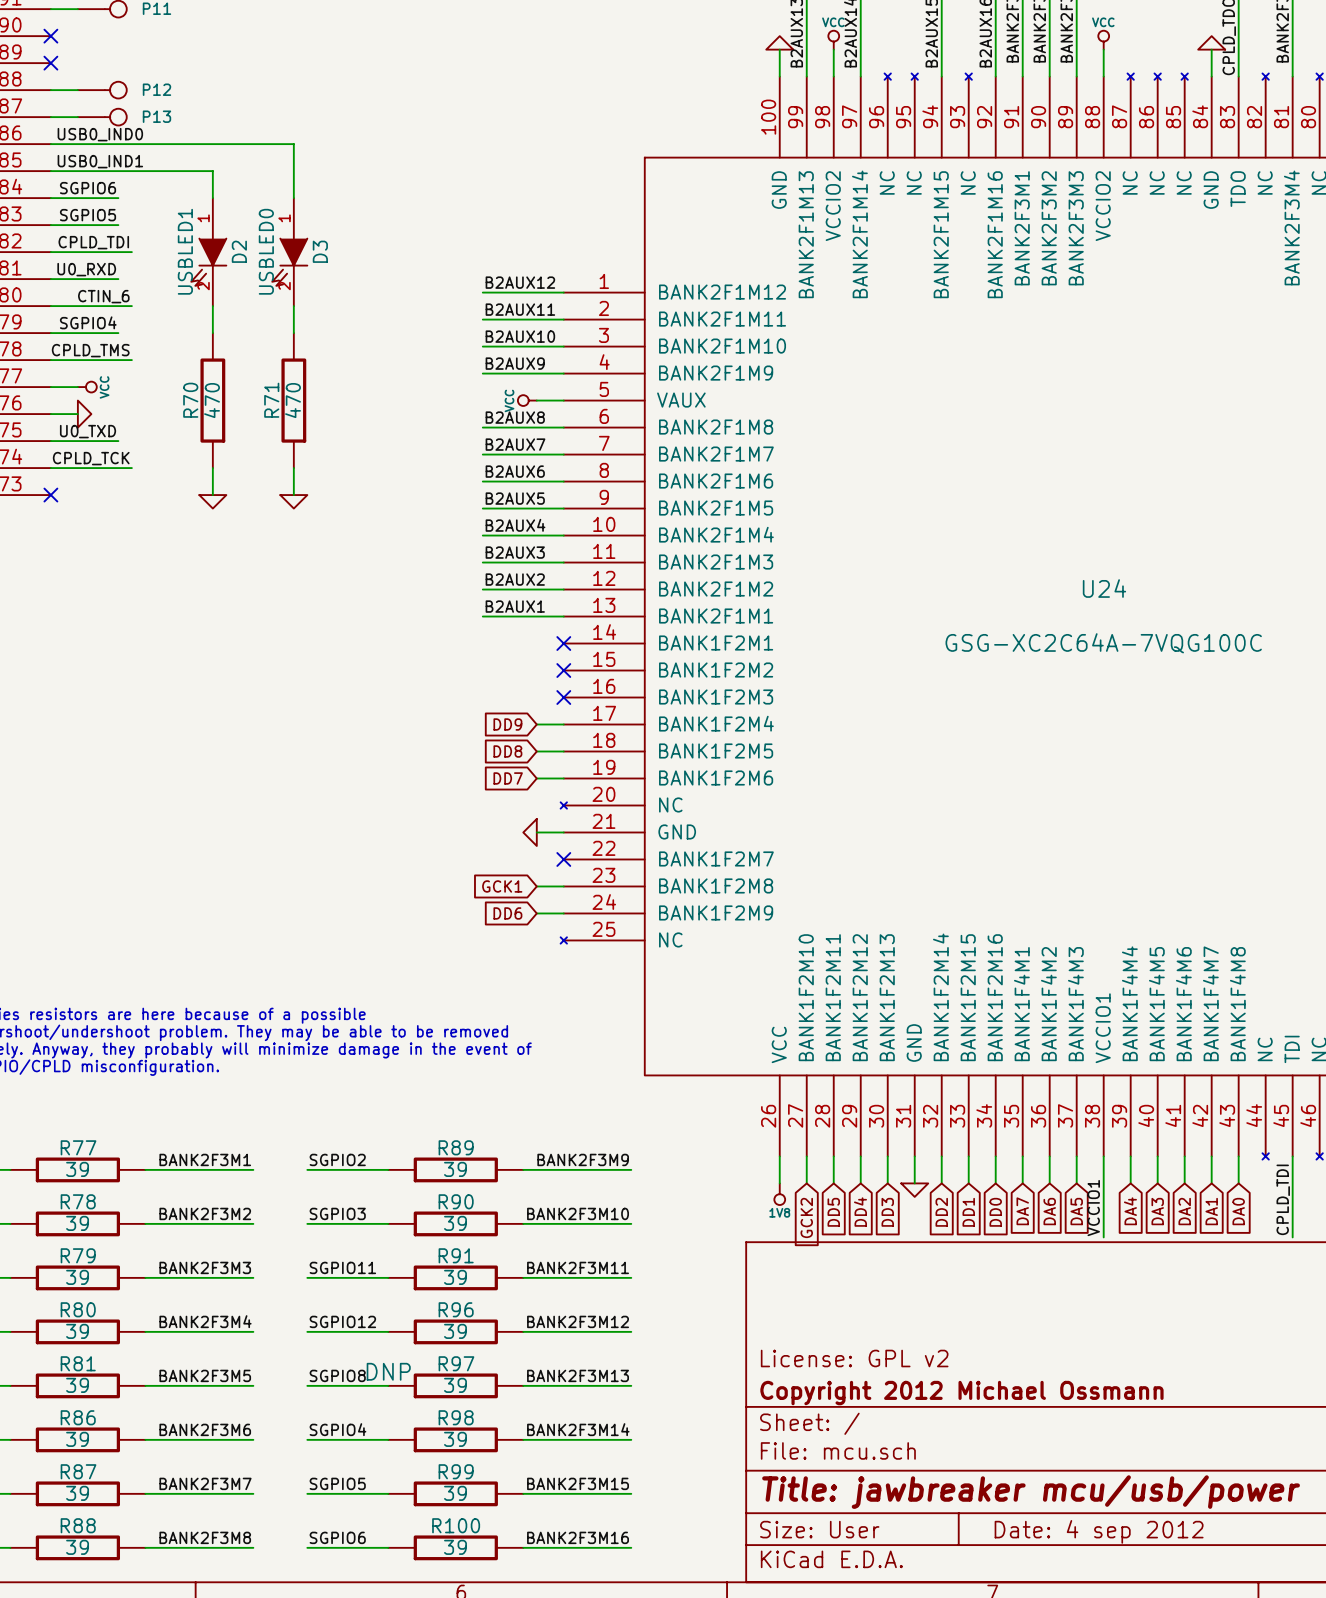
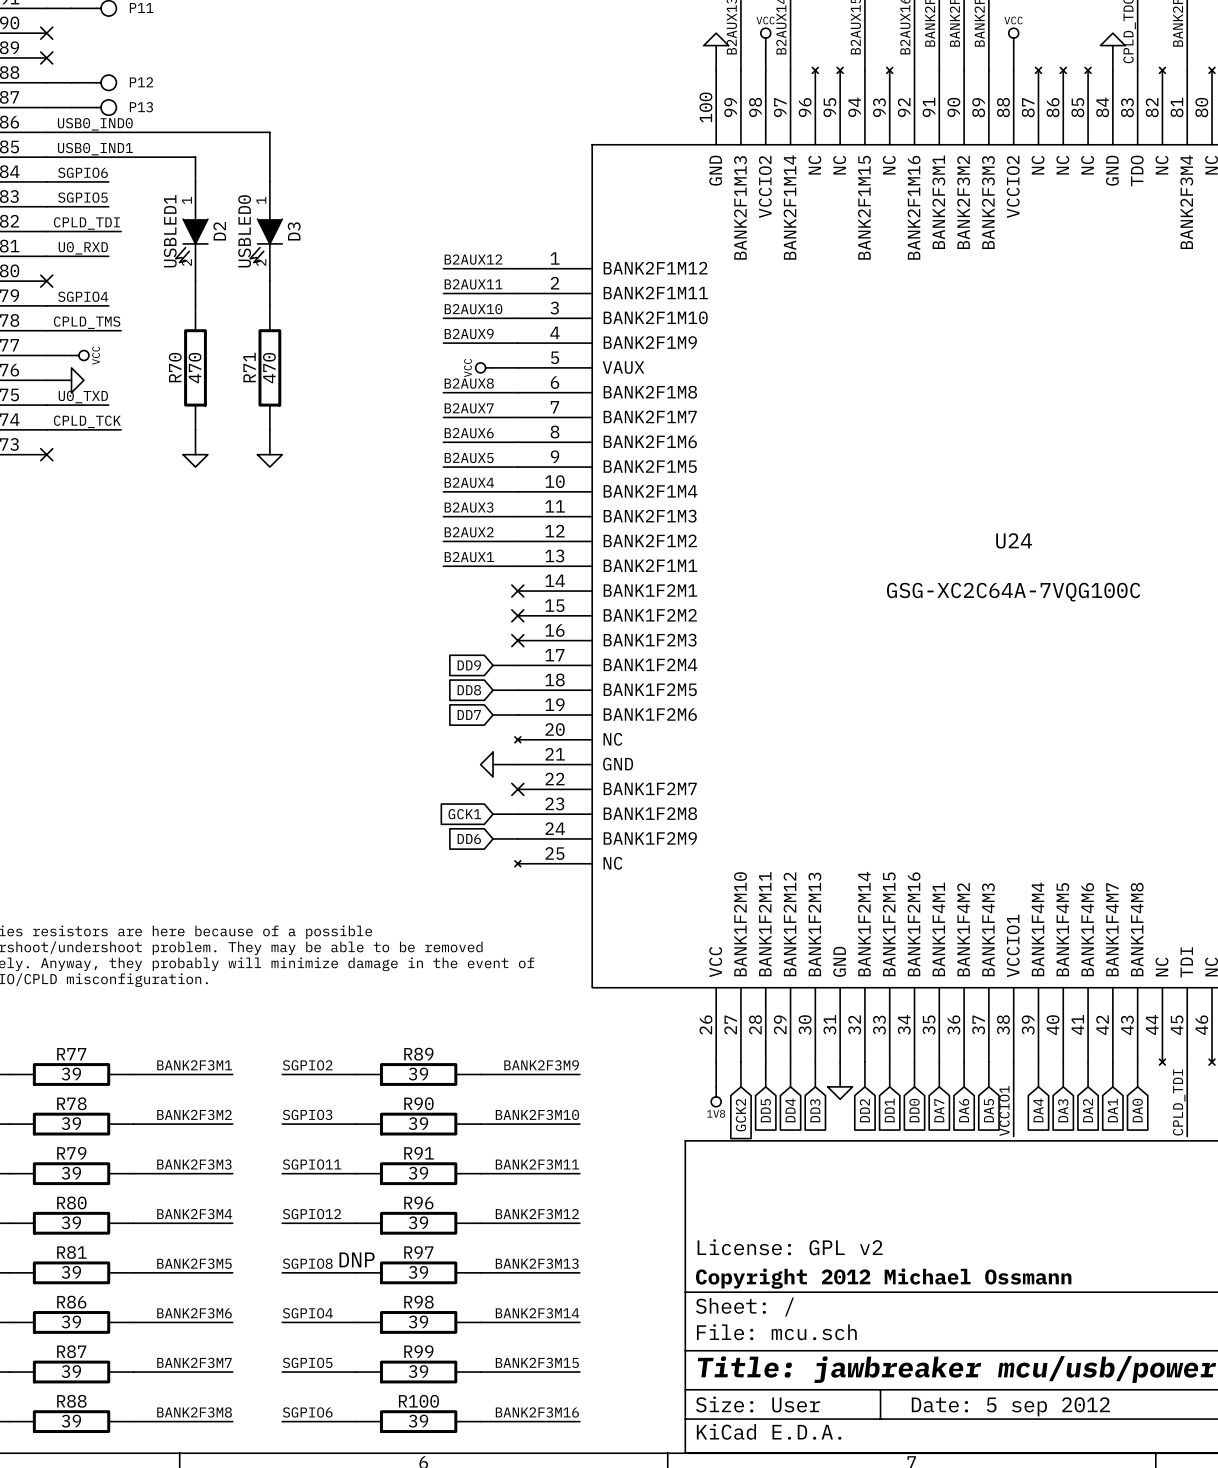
label: CTIN_6 (103, 296) -> none
wire: (50, 306) (131, 306) -> none
no-connect mark: none -> (46, 281)
title block: Date: 4 sep 2012 (1099, 1531) -> Date: 5 sep 2012 (1010, 1406)

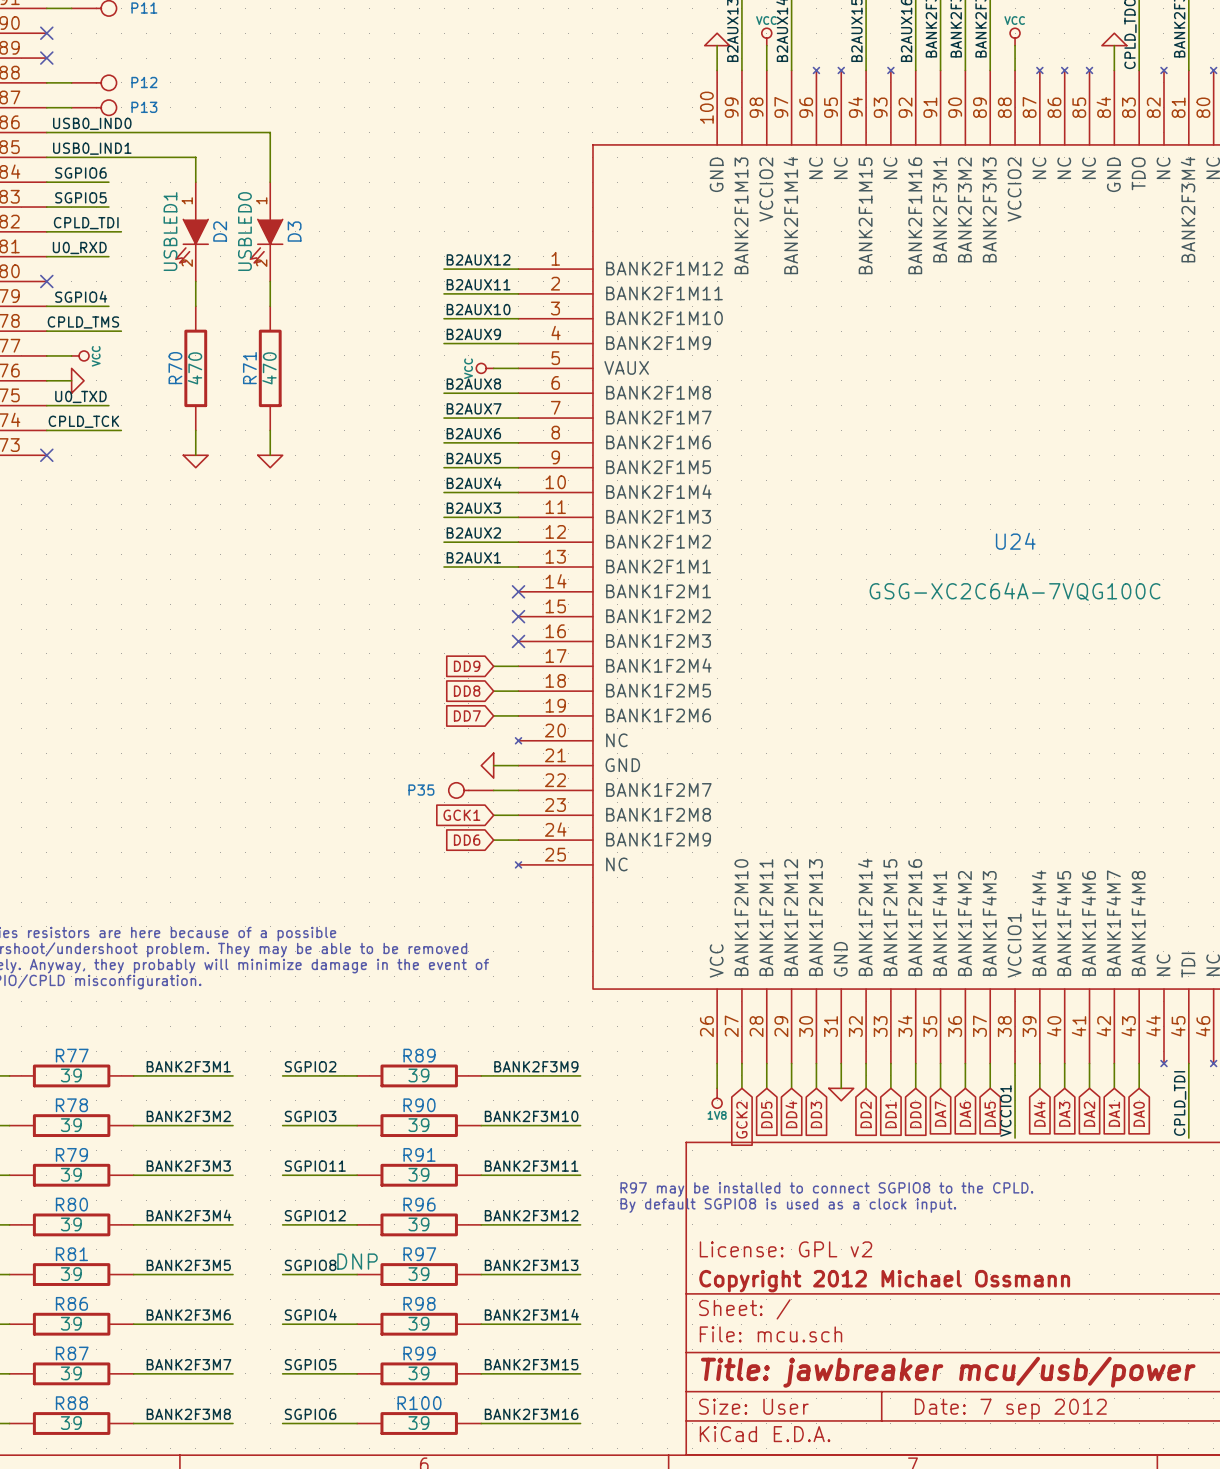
P35: none -> (471, 790)
wire: none -> (493, 790) (518, 790)
no-connect mark: (517, 789) -> none
text: none -> R97 may be installed to connect SGPIO8 to the CPLD. (826, 1189)
text: none -> By default SGPIO8 is used as a clock input. (788, 1205)
title block: Date: 5 sep 2012 (1010, 1406) -> Date: 7 sep 2012 (1010, 1409)

